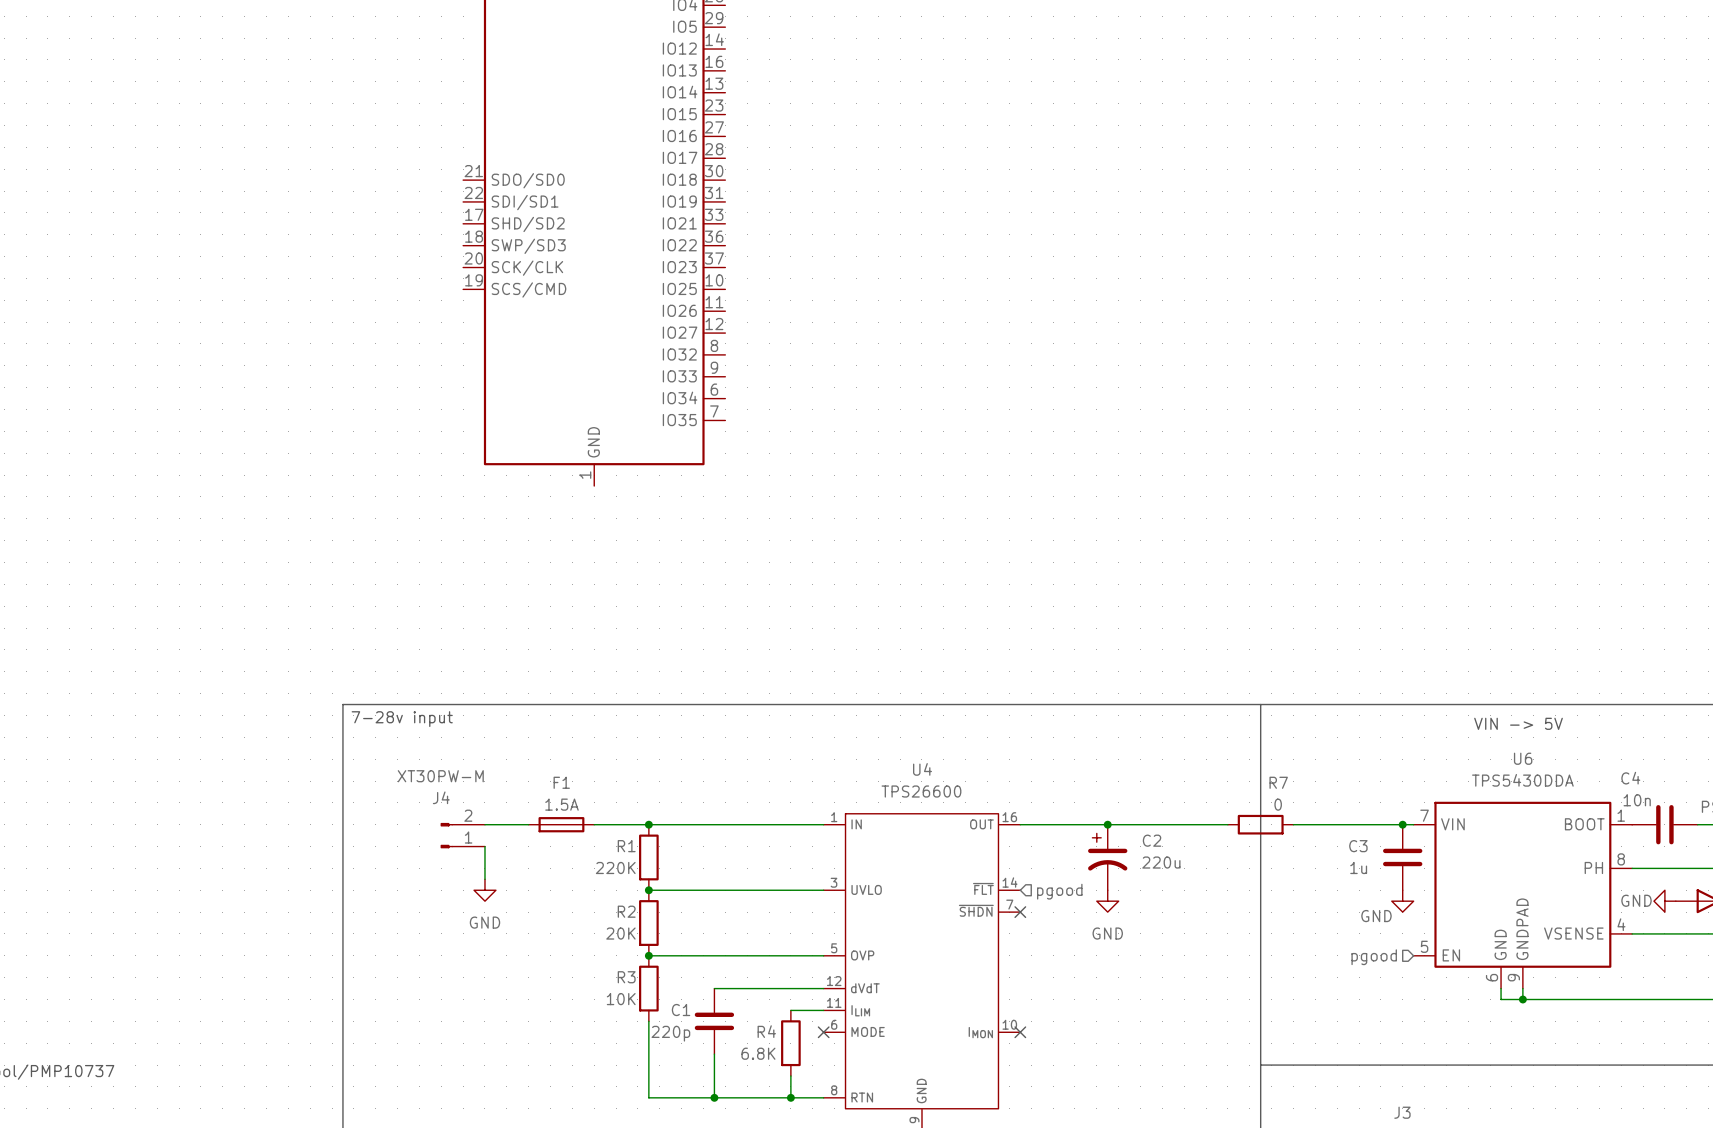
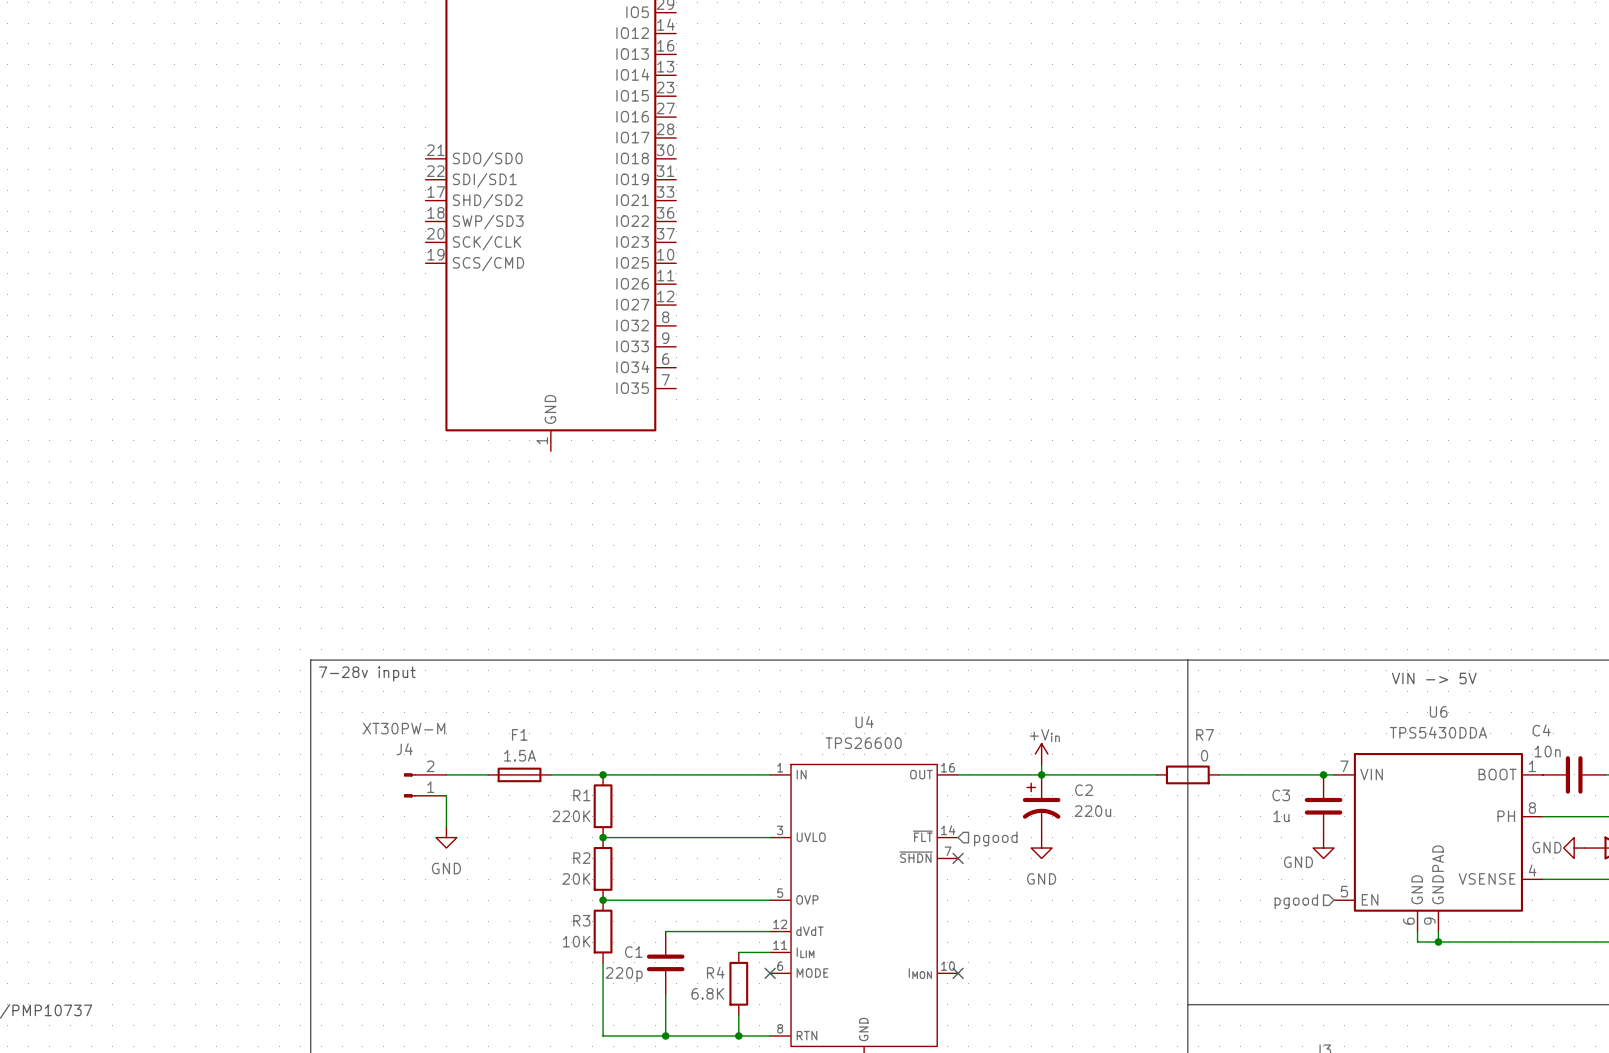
power symbol: none -> +Vin (1041, 754)
wire: none -> (1041, 764) (1041, 774)

